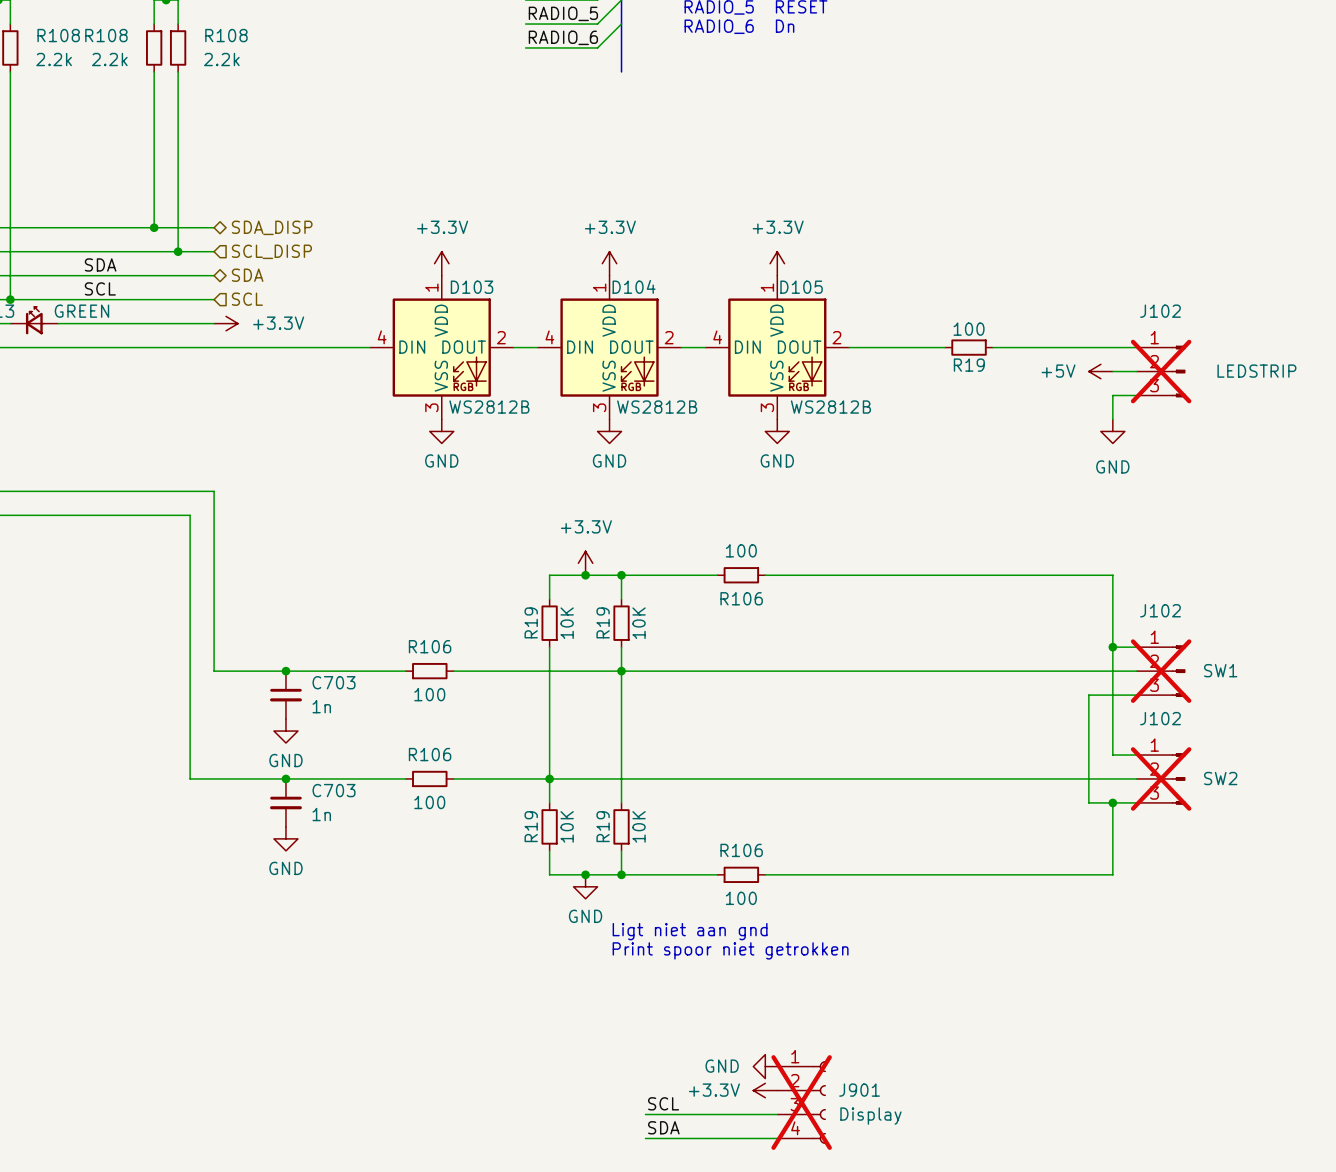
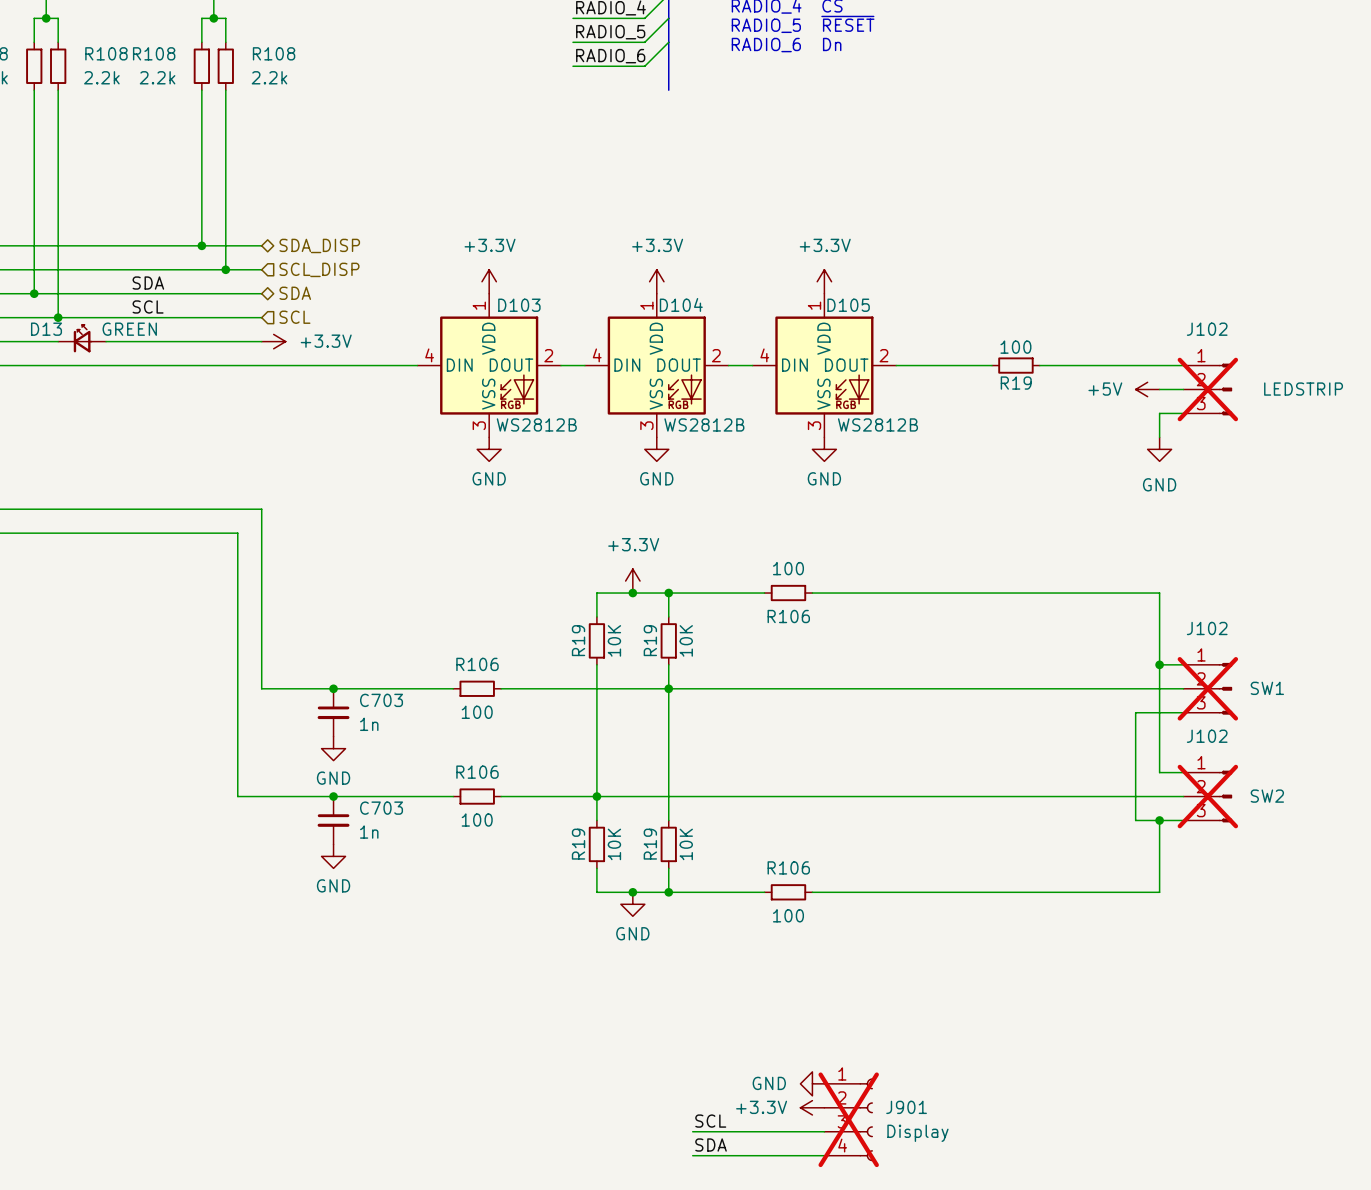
text: Ligt niet aan gnd (690, 931) -> none
text: Print spoor niet getrokken (730, 950) -> none

